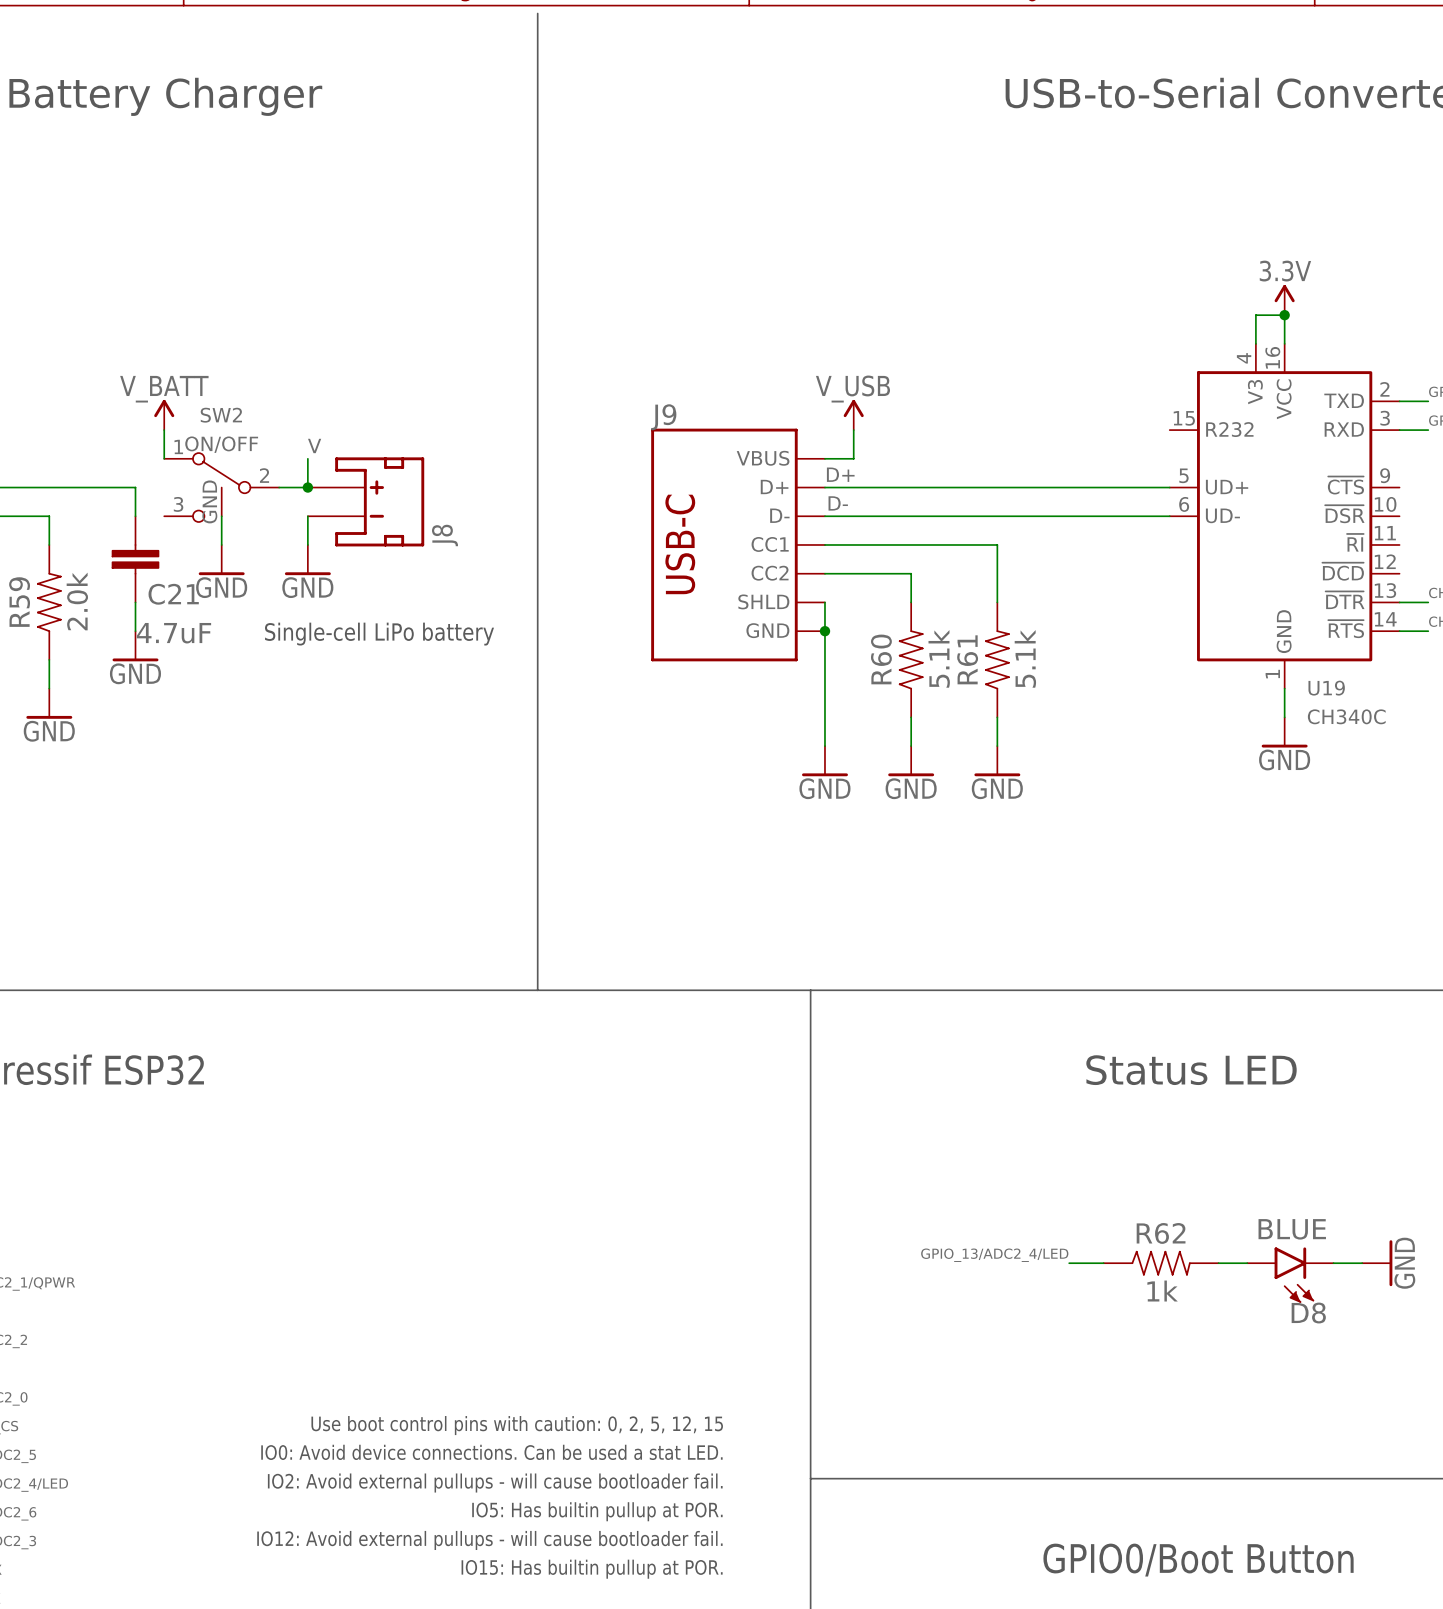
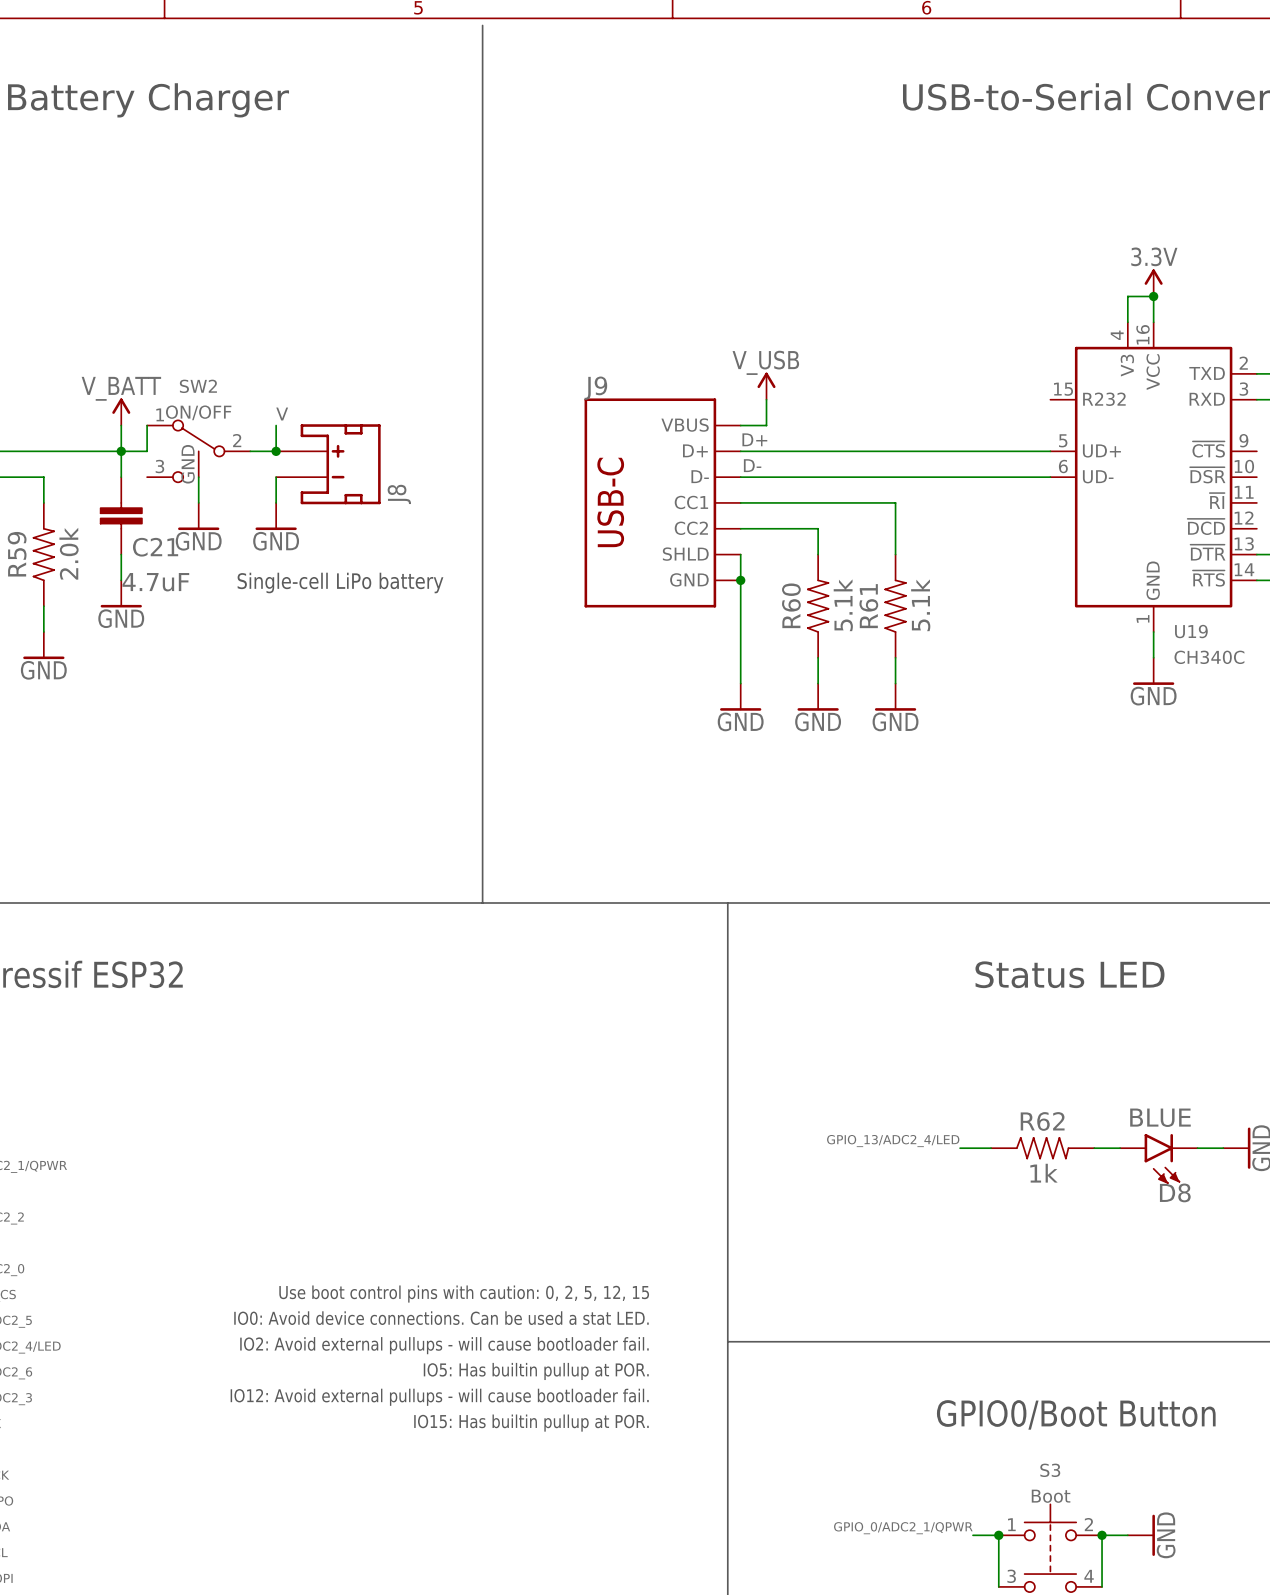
power symbol position: V_BATT (164, 414) -> V_BATT (121, 411)
wire: (164, 430) (164, 458) -> (121, 425) (121, 451) (147, 451) (147, 425)
junction: none -> (121, 451)

